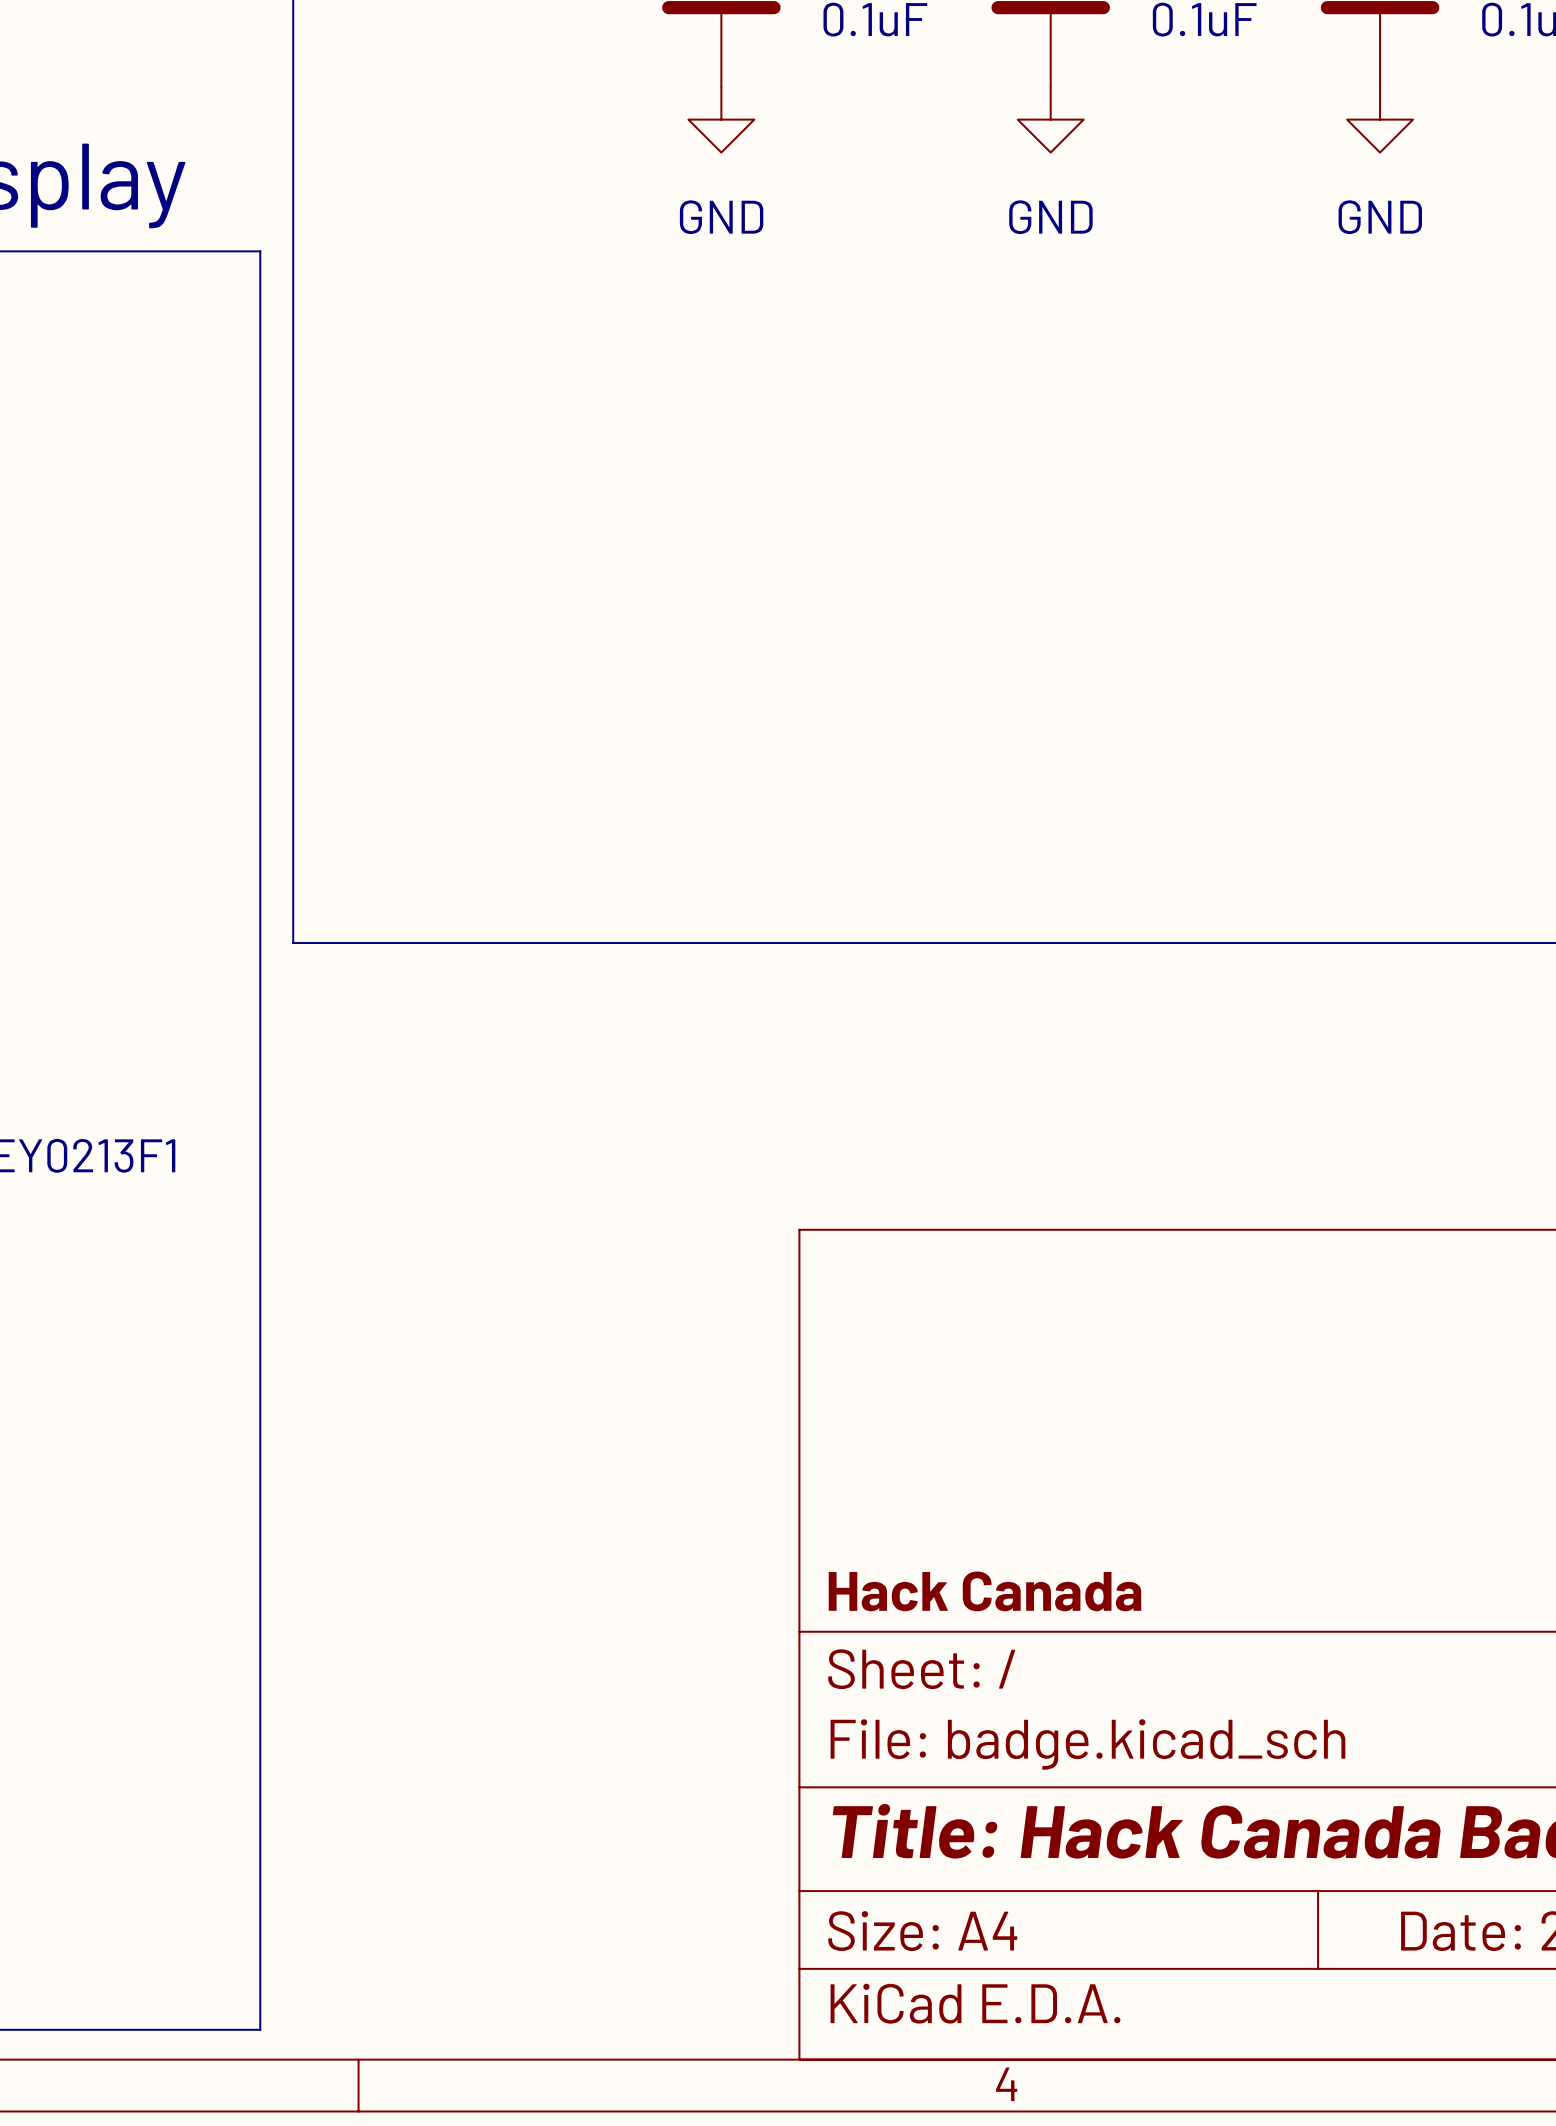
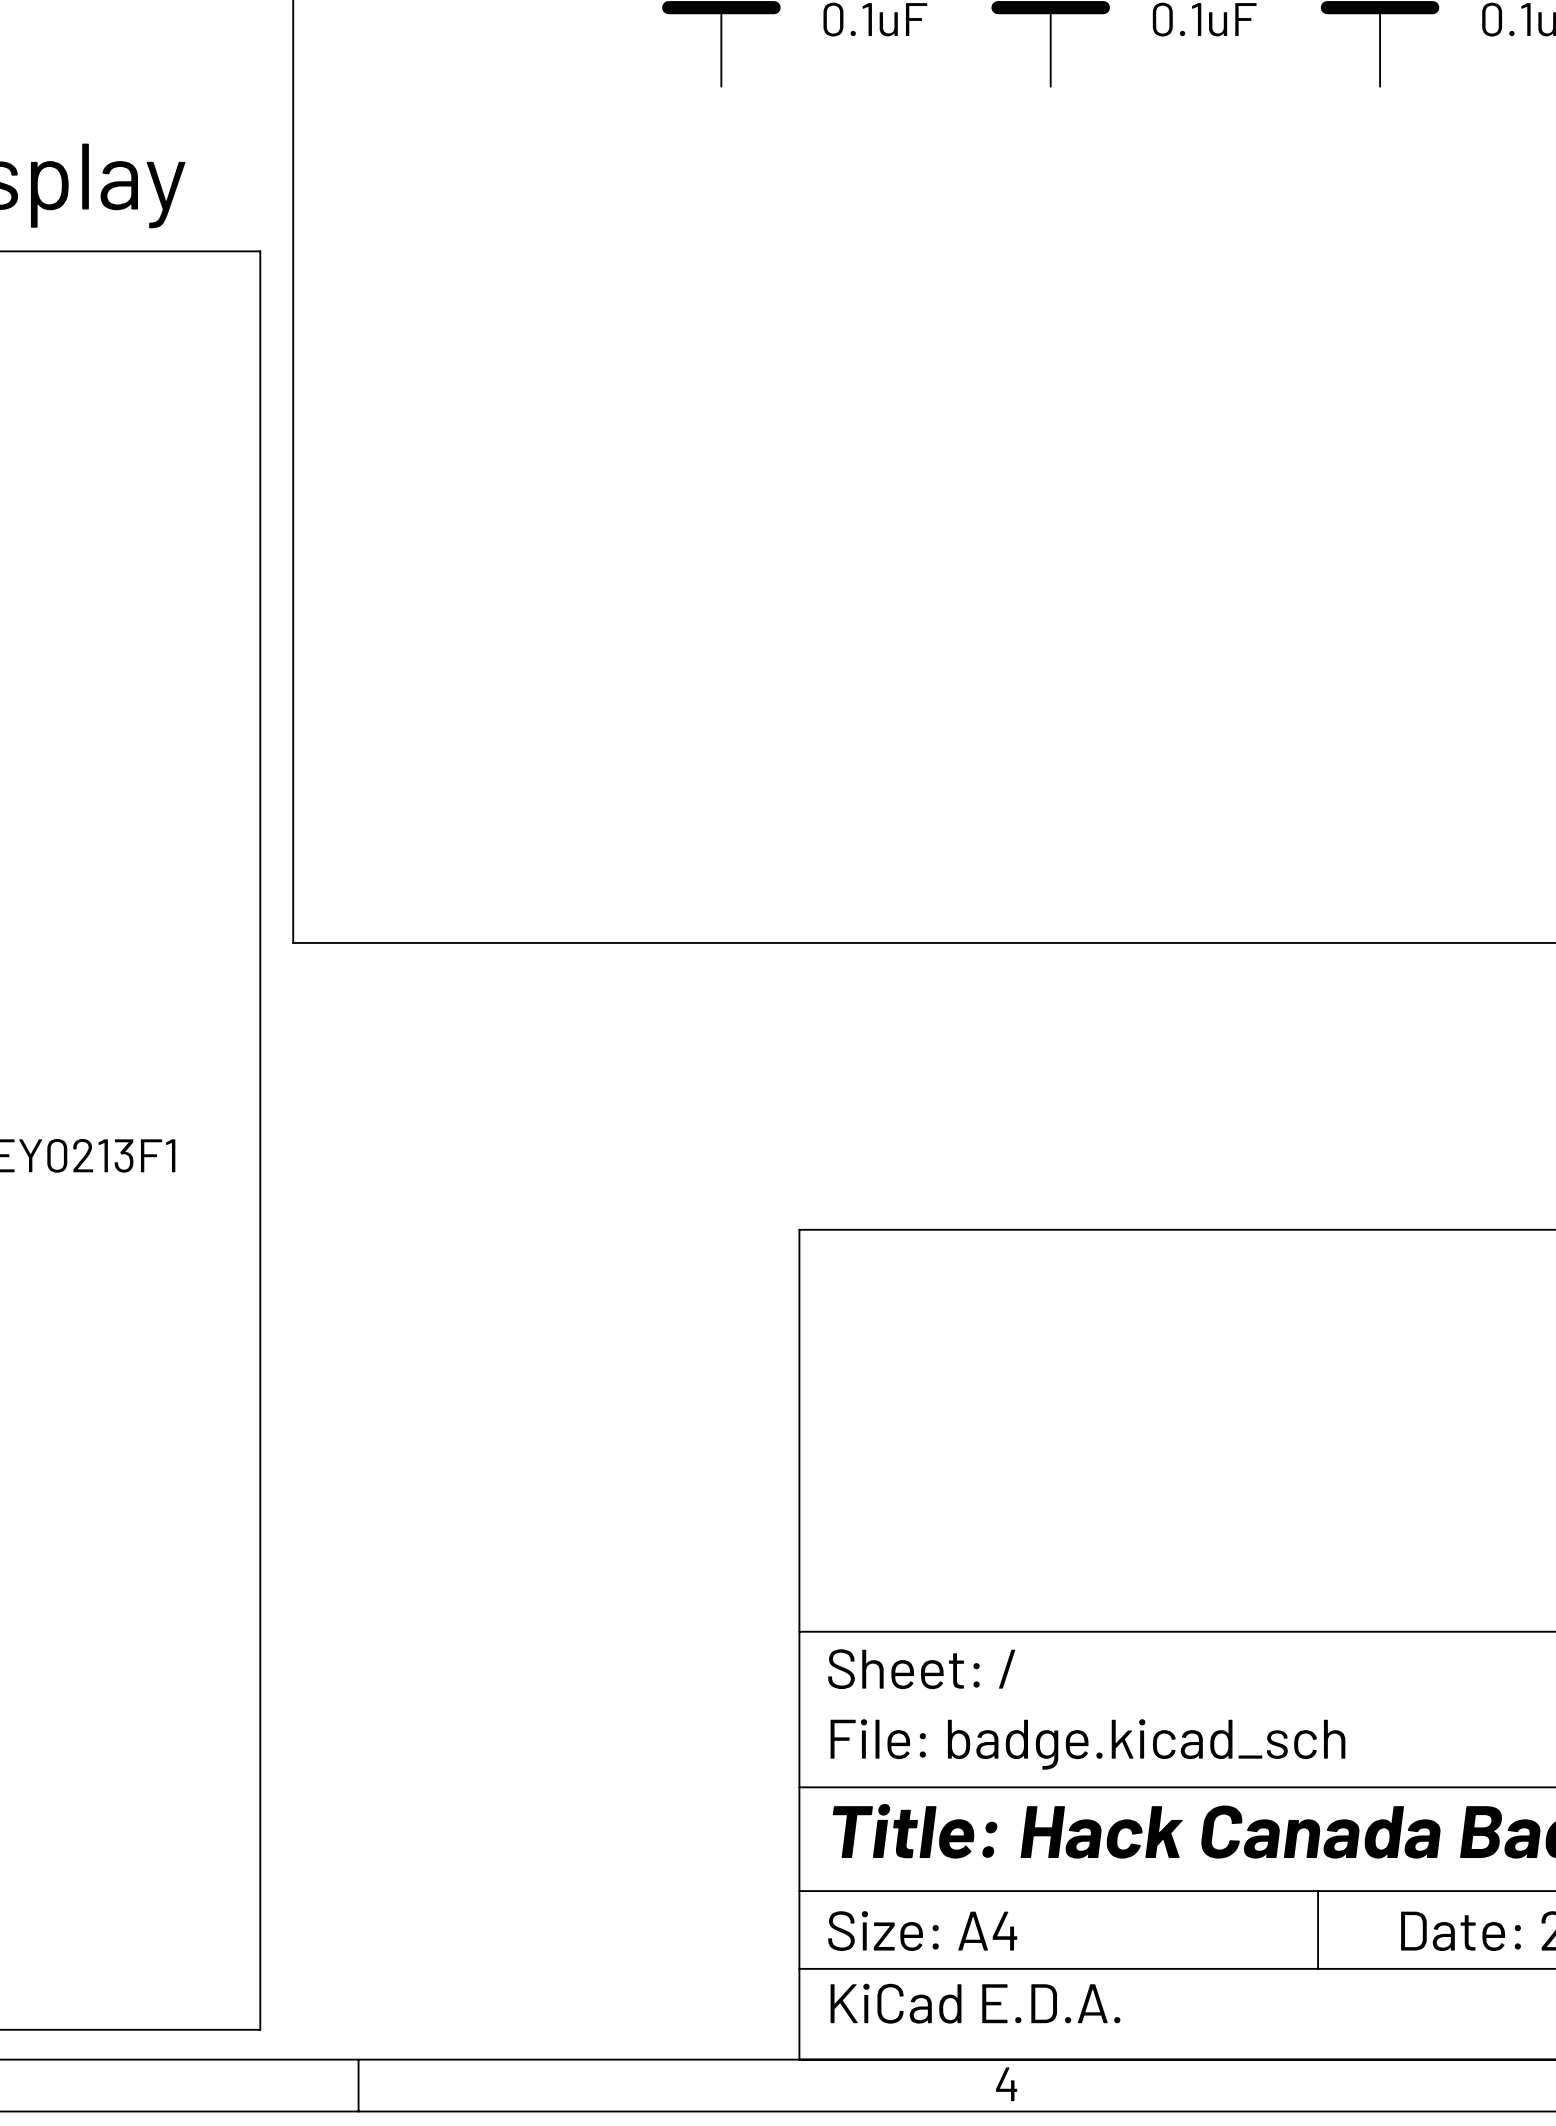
power symbol: GND (721, 119) -> none
power symbol: GND (1050, 119) -> none
power symbol: GND (1380, 119) -> none
title block: Hack Canada (984, 1591) -> none

